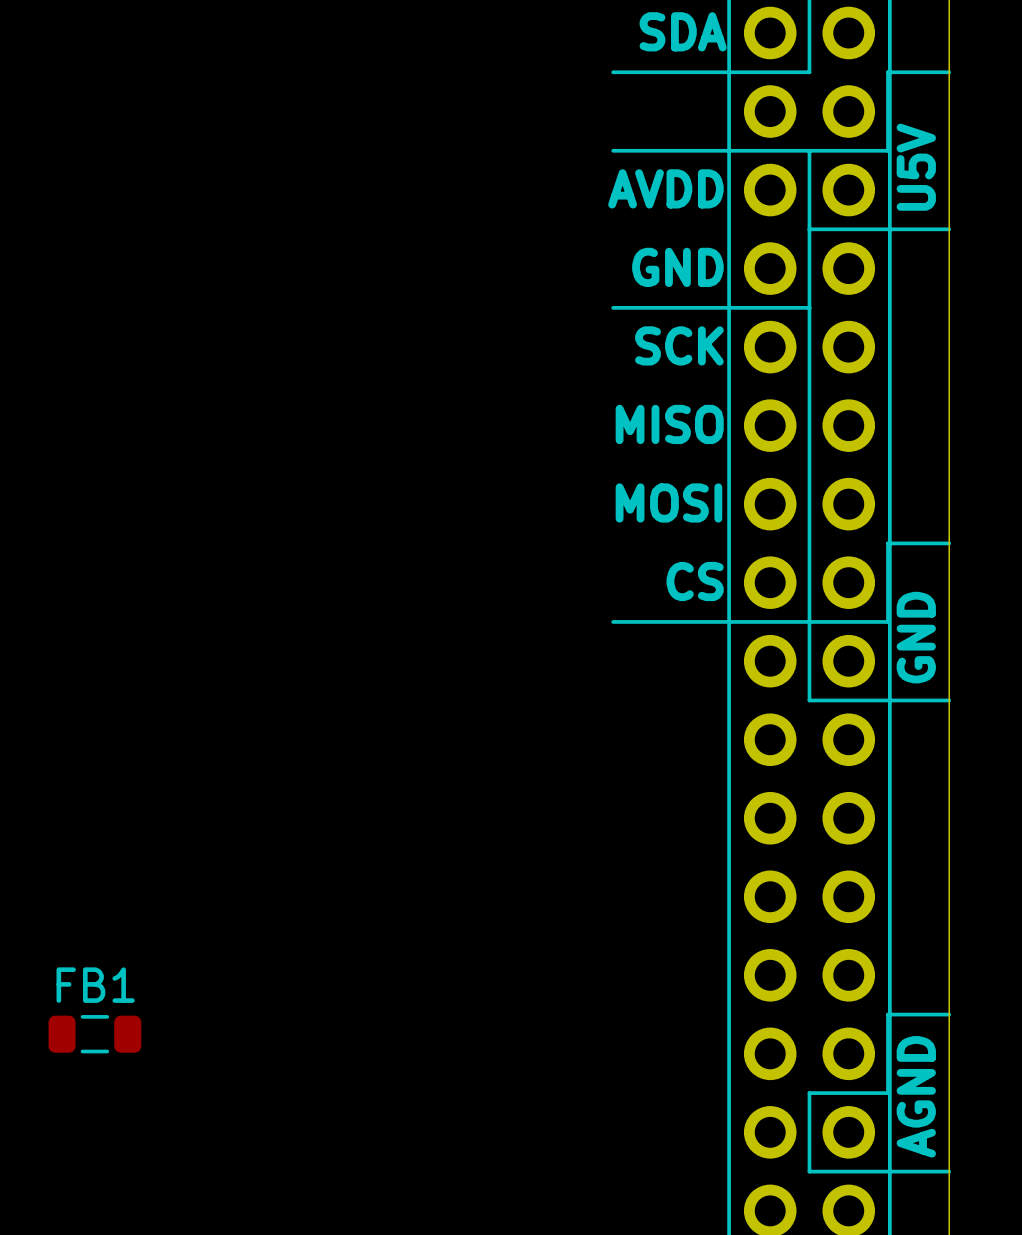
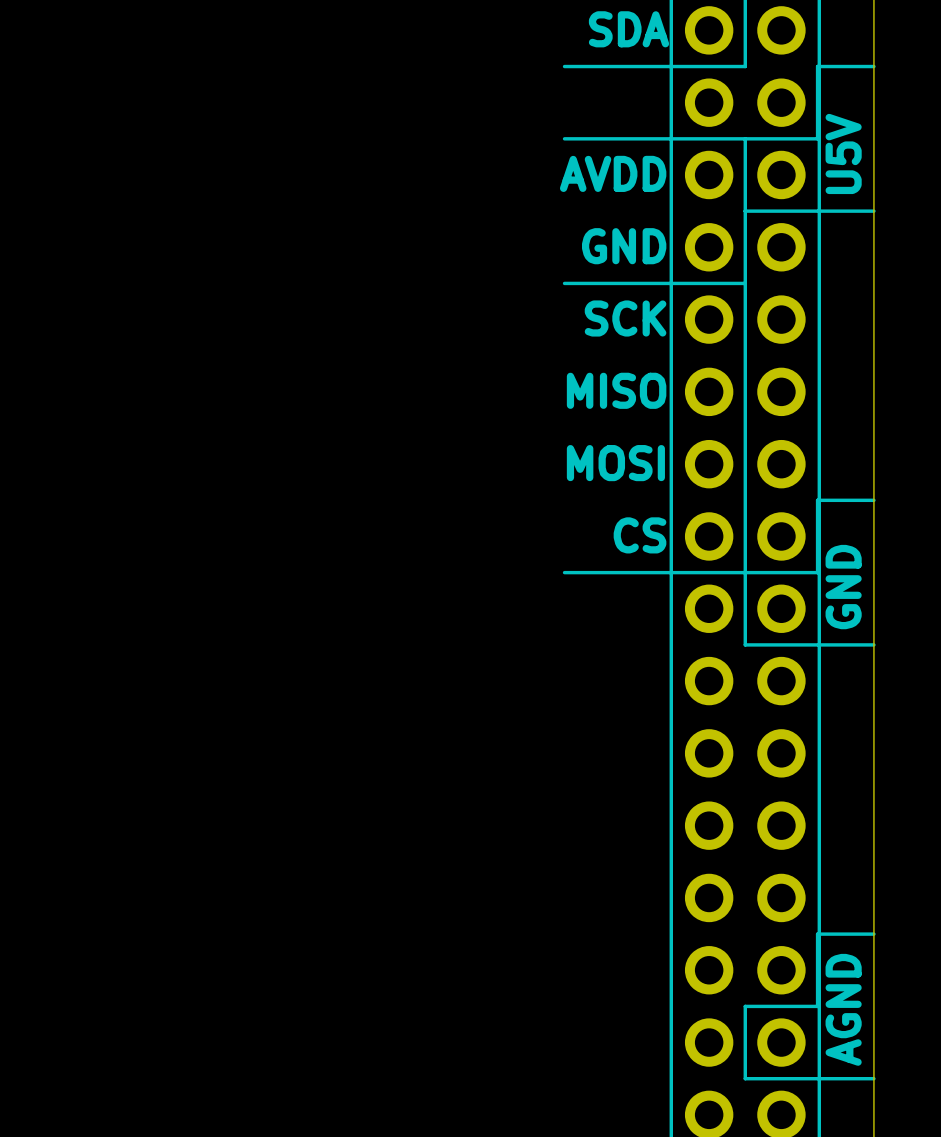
FB1: (94, 1034) -> none

